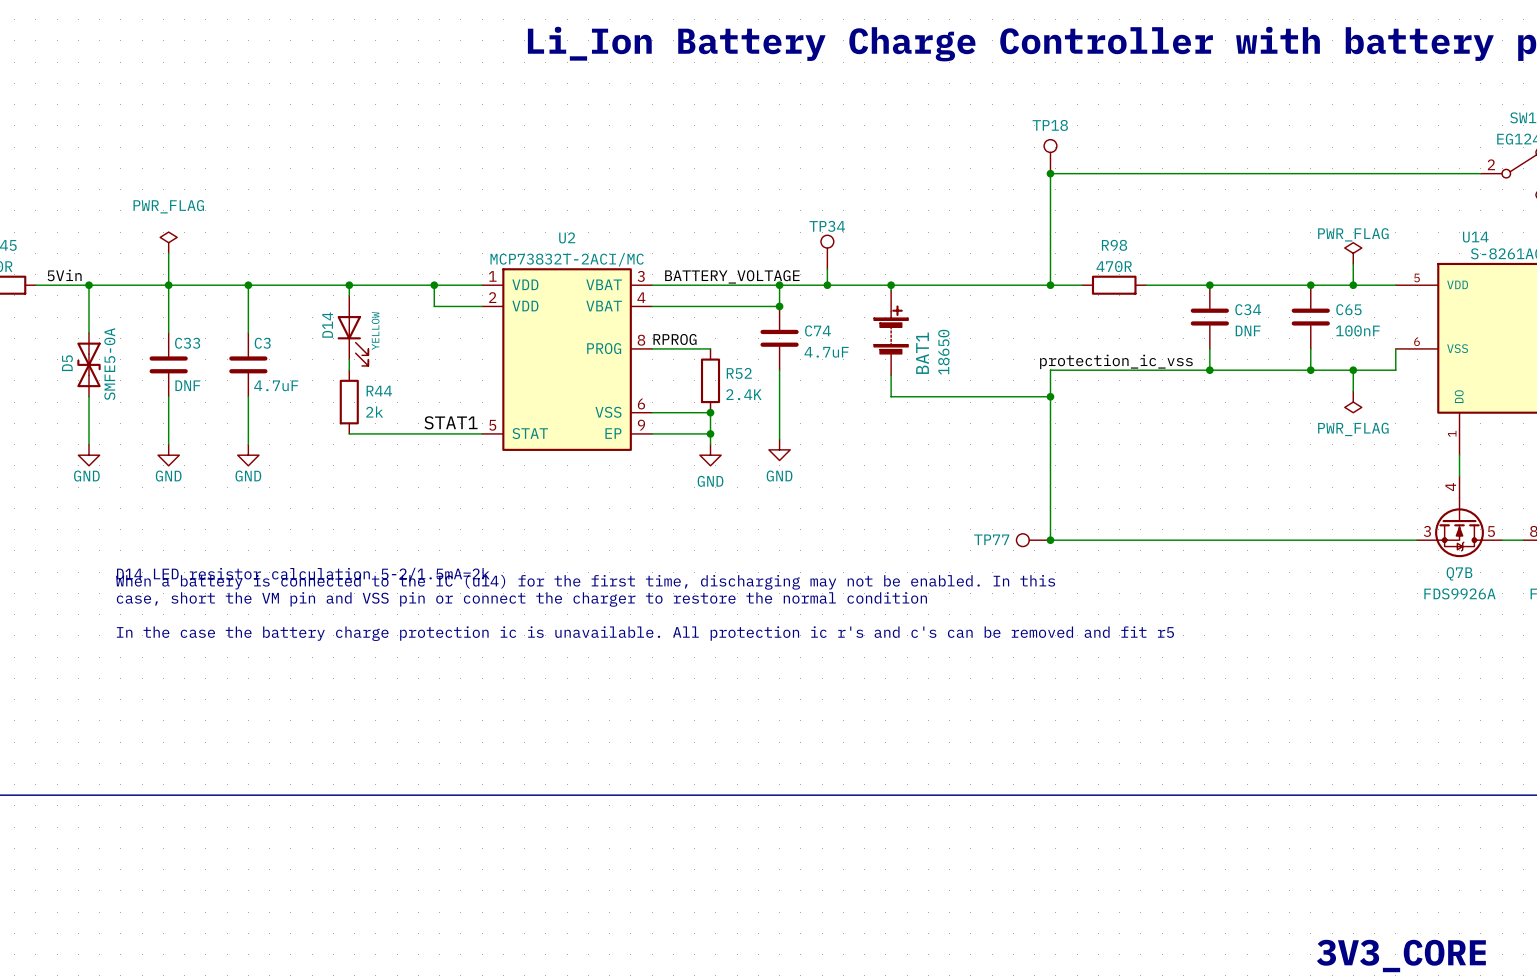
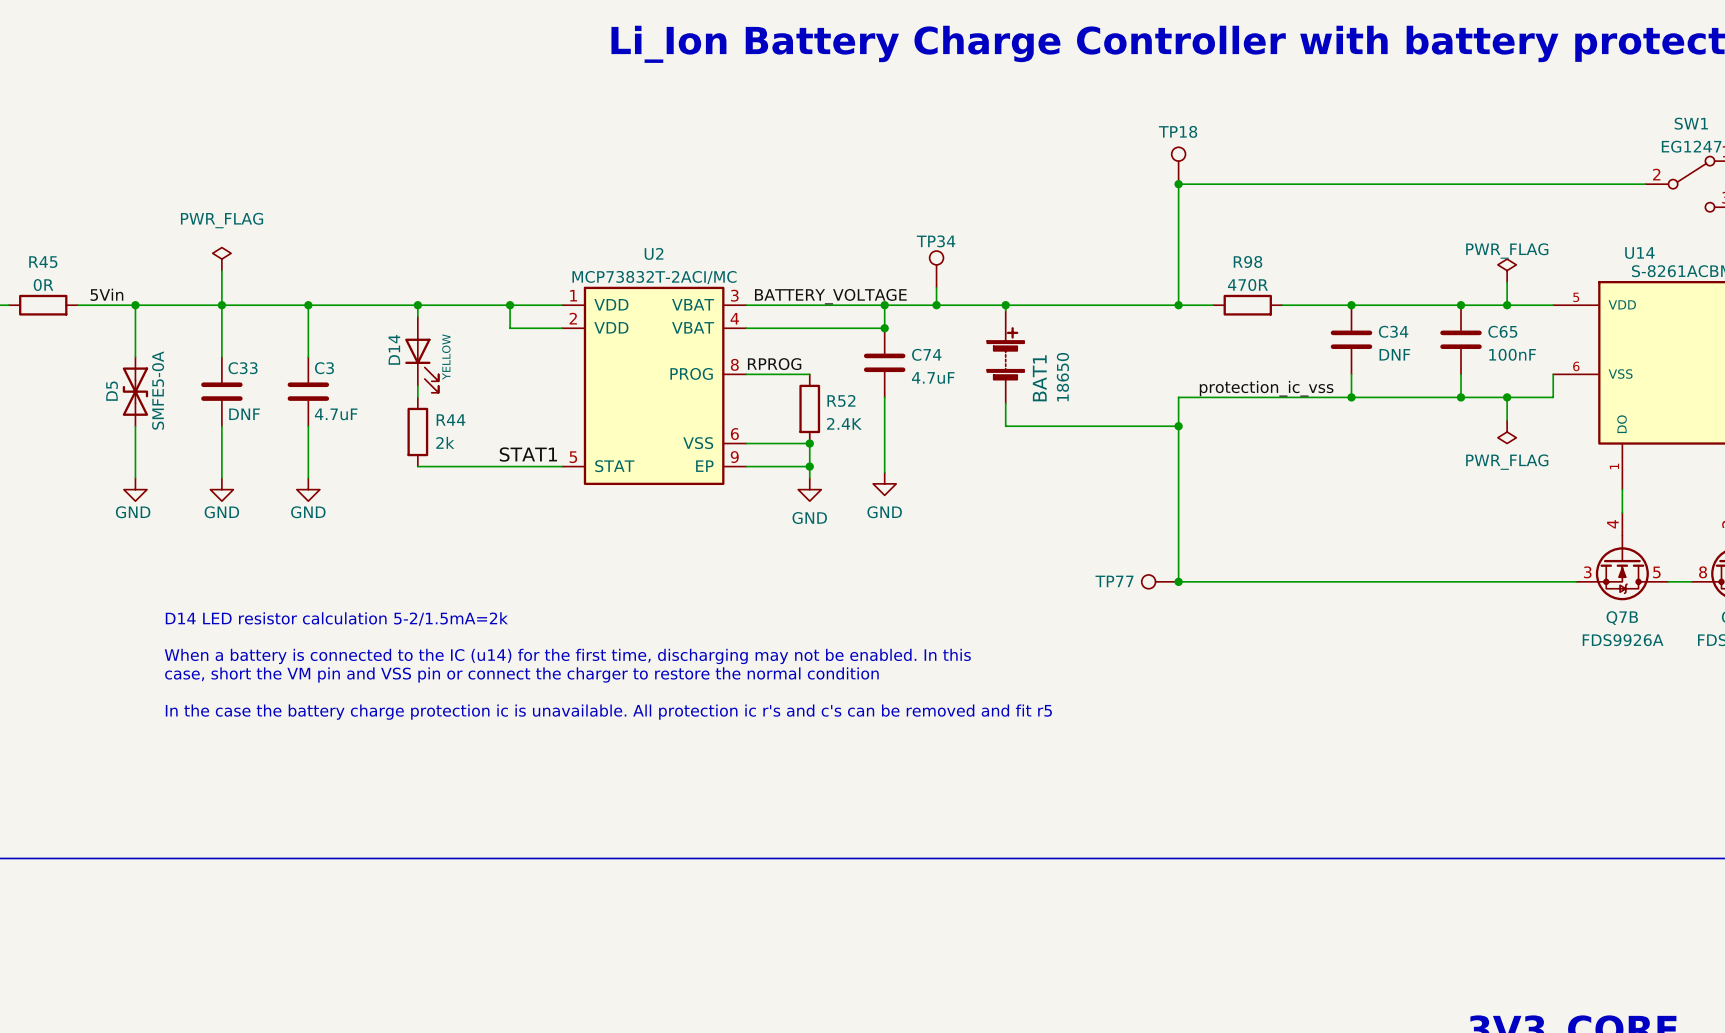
text position: When a battery is connected to the IC (u14) for the first time, discharging may not be enabled. In this (585, 582) -> When a battery is connected to the IC (u14) for the first time, discharging may not be enabled. In this (567, 656)
text position: case, short the VM pin and VSS pin or connect the charger to restore the normal condition (521, 599) -> case, short the VM pin and VSS pin or connect the charger to restore the normal condition (521, 675)
text position: In the case the battery charge protection ic is unavailable. All protection ic r's and c's can be removed and fit r5 (645, 633) -> In the case the battery charge protection ic is unavailable. All protection ic r's and c's can be removed and fit r5 (608, 712)

